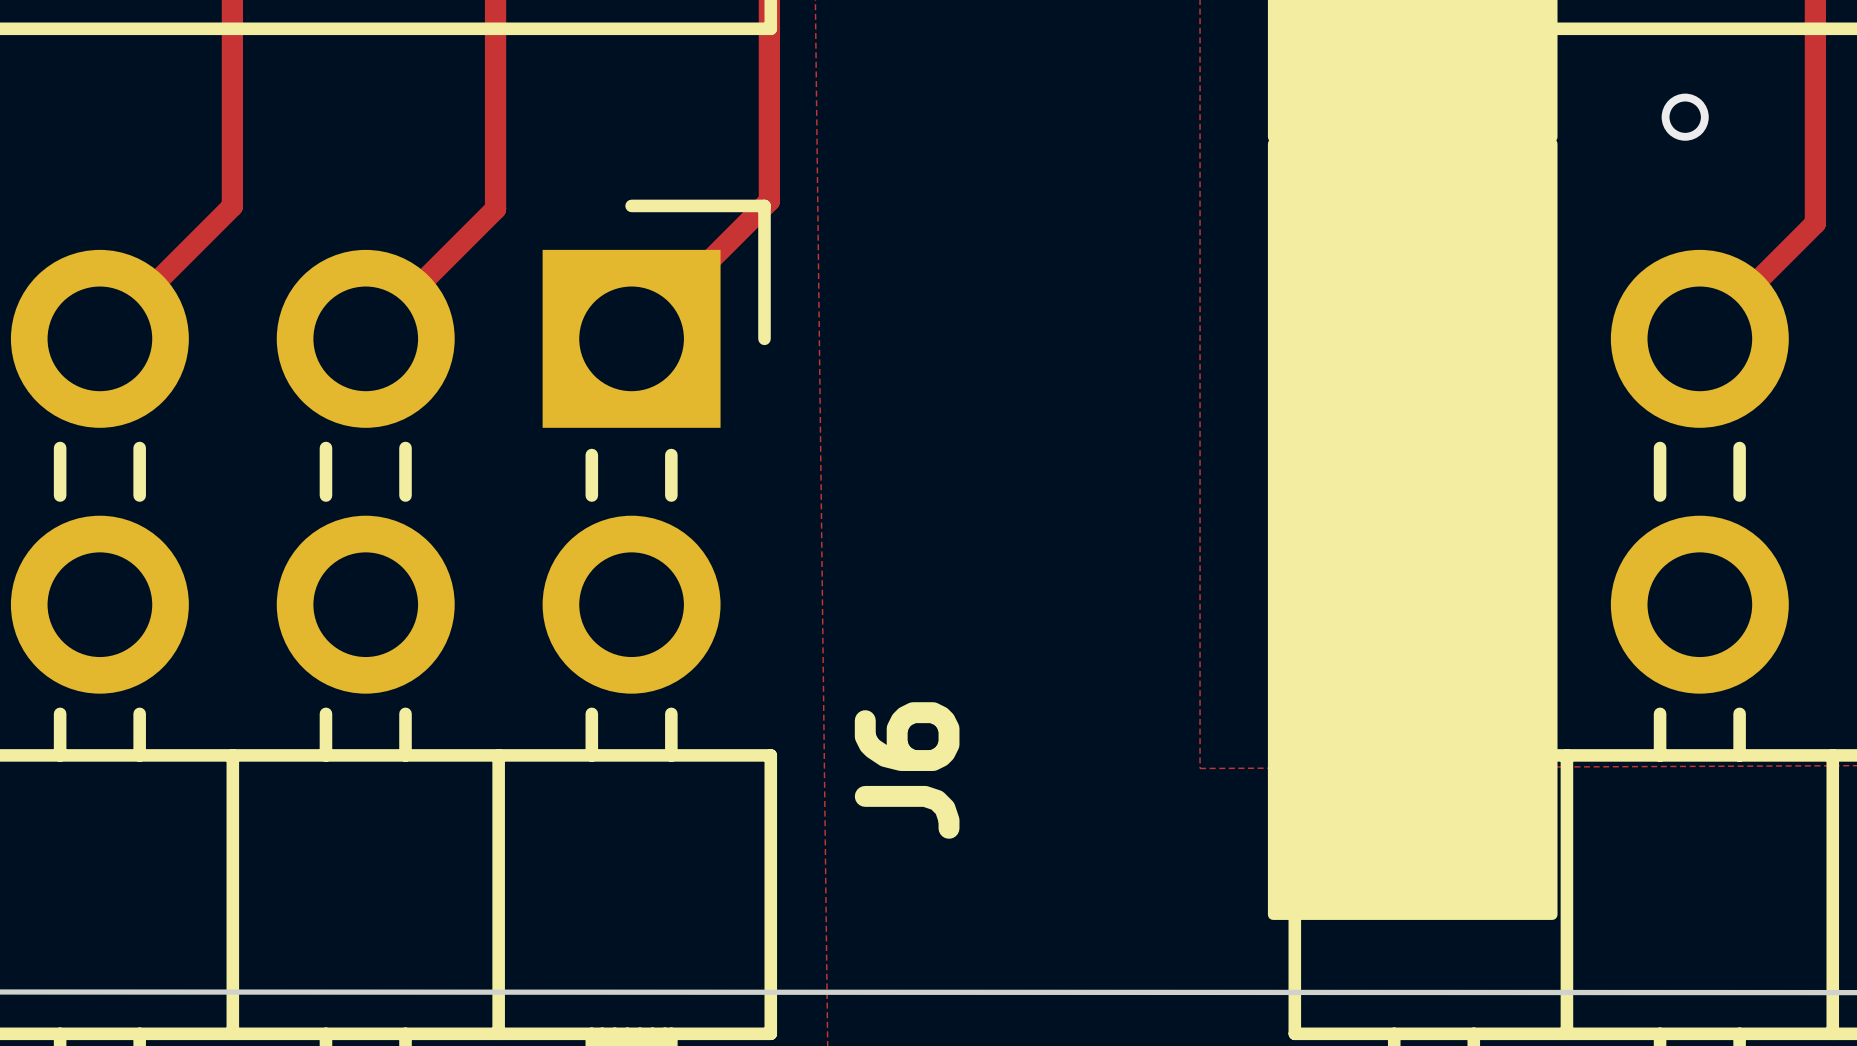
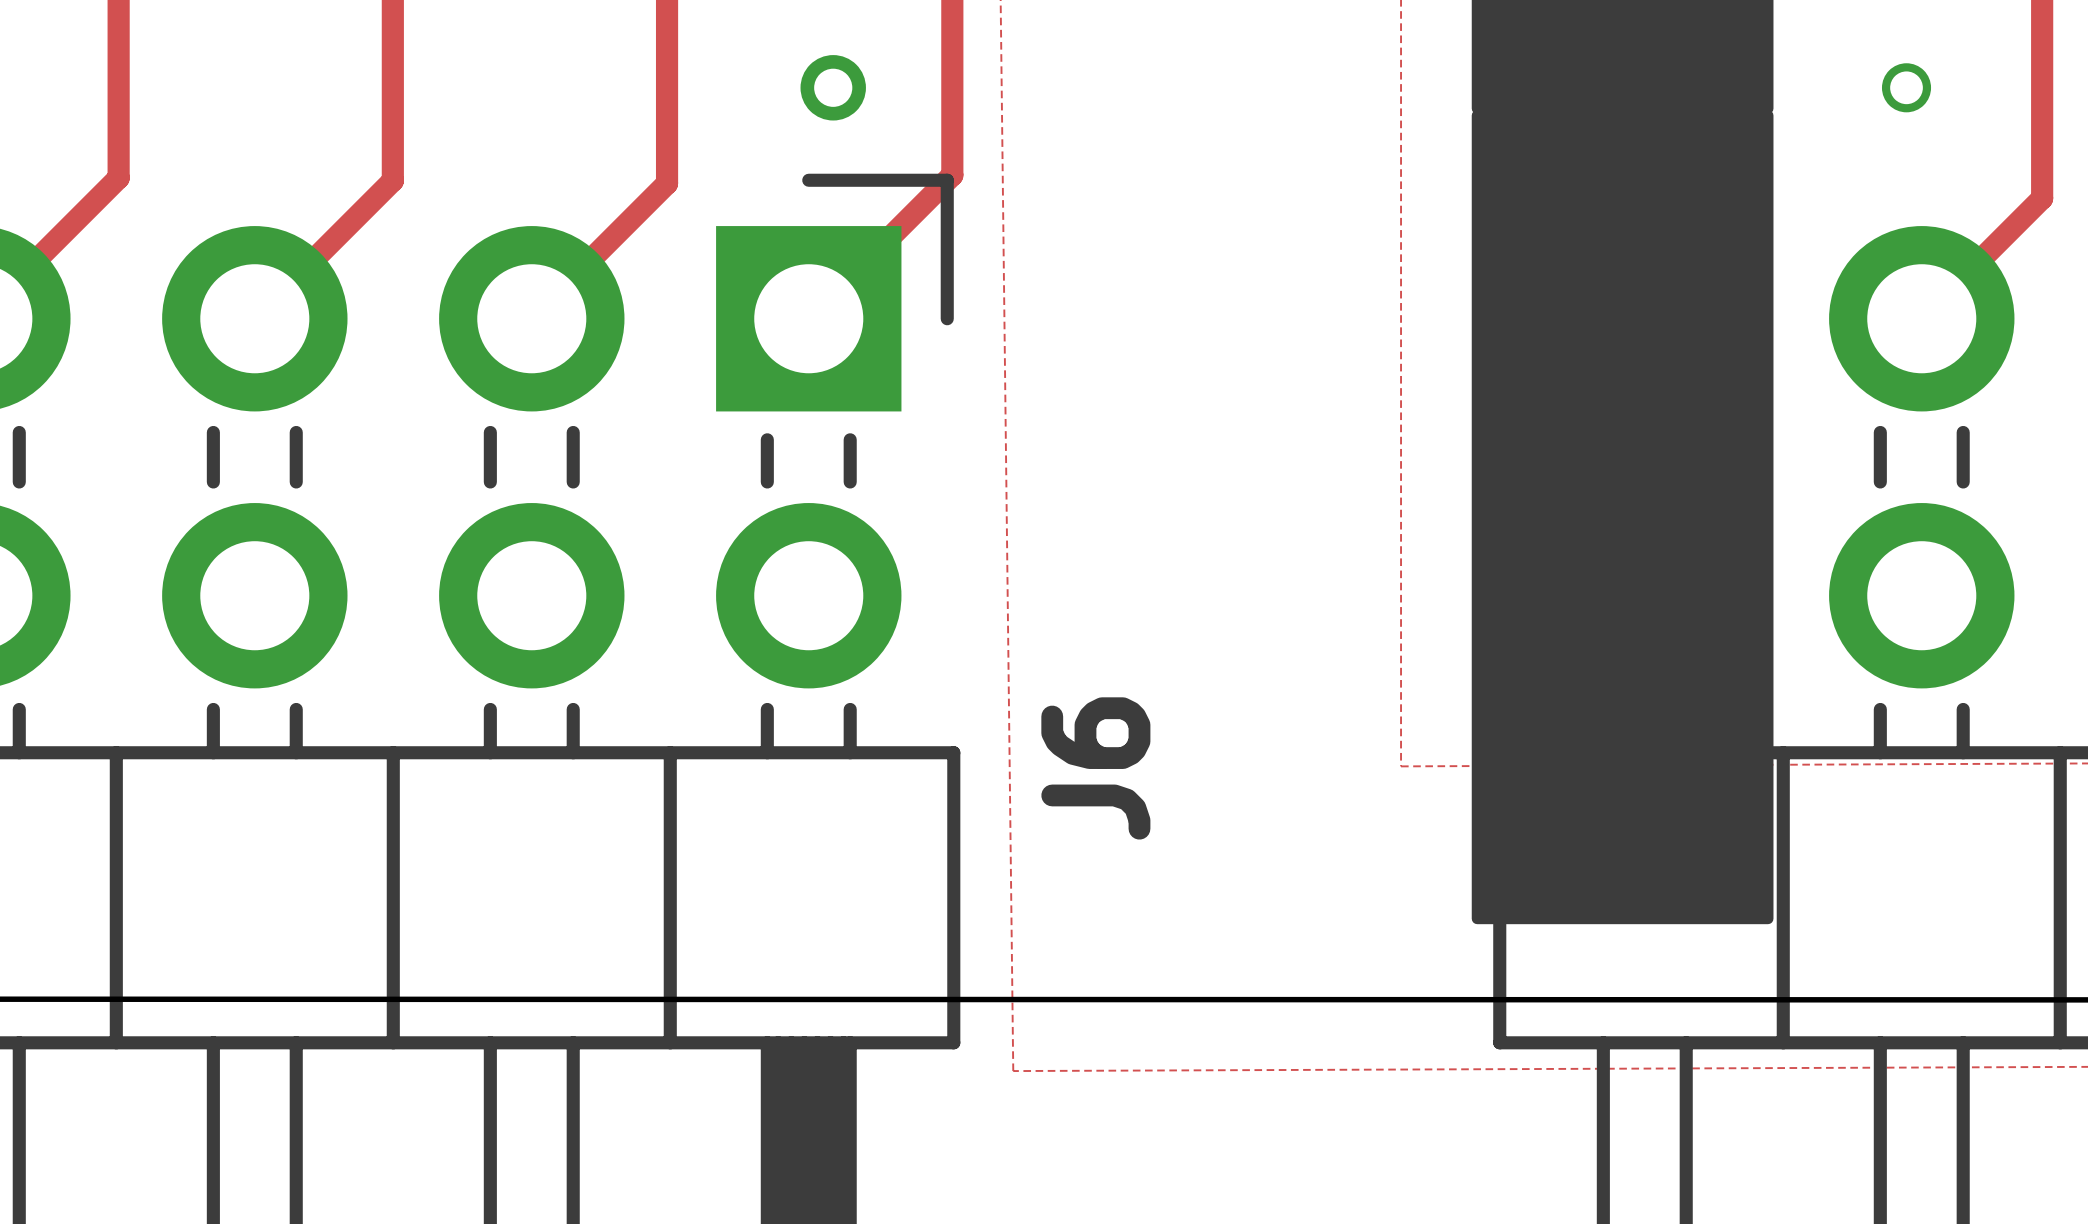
via: none -> (833, 87)

